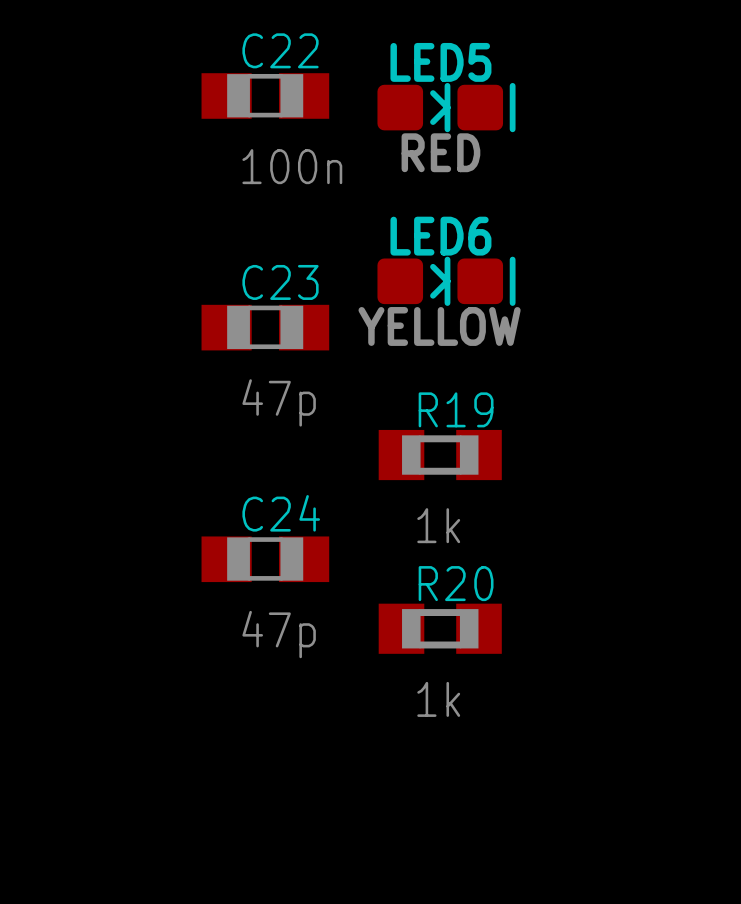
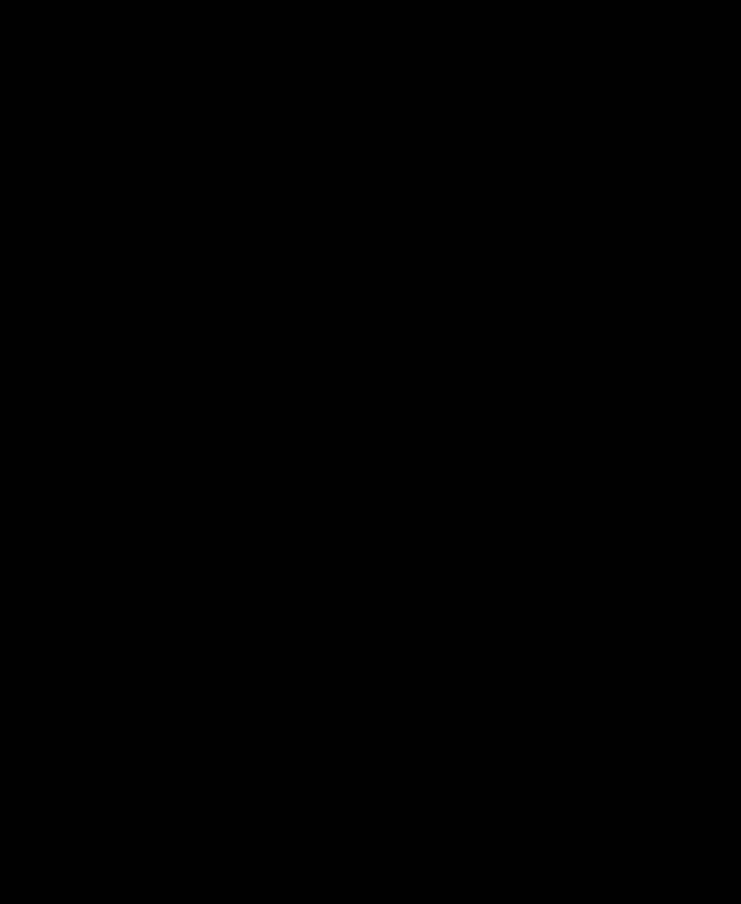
C22: 100n (265, 95) -> none
LED5: RED (446, 107) -> none
LED6: YELLOW (446, 281) -> none
C23: 47p (265, 327) -> none
R19: 1k (440, 455) -> none
C24: 47p (265, 559) -> none
R20: 1k (440, 628) -> none

